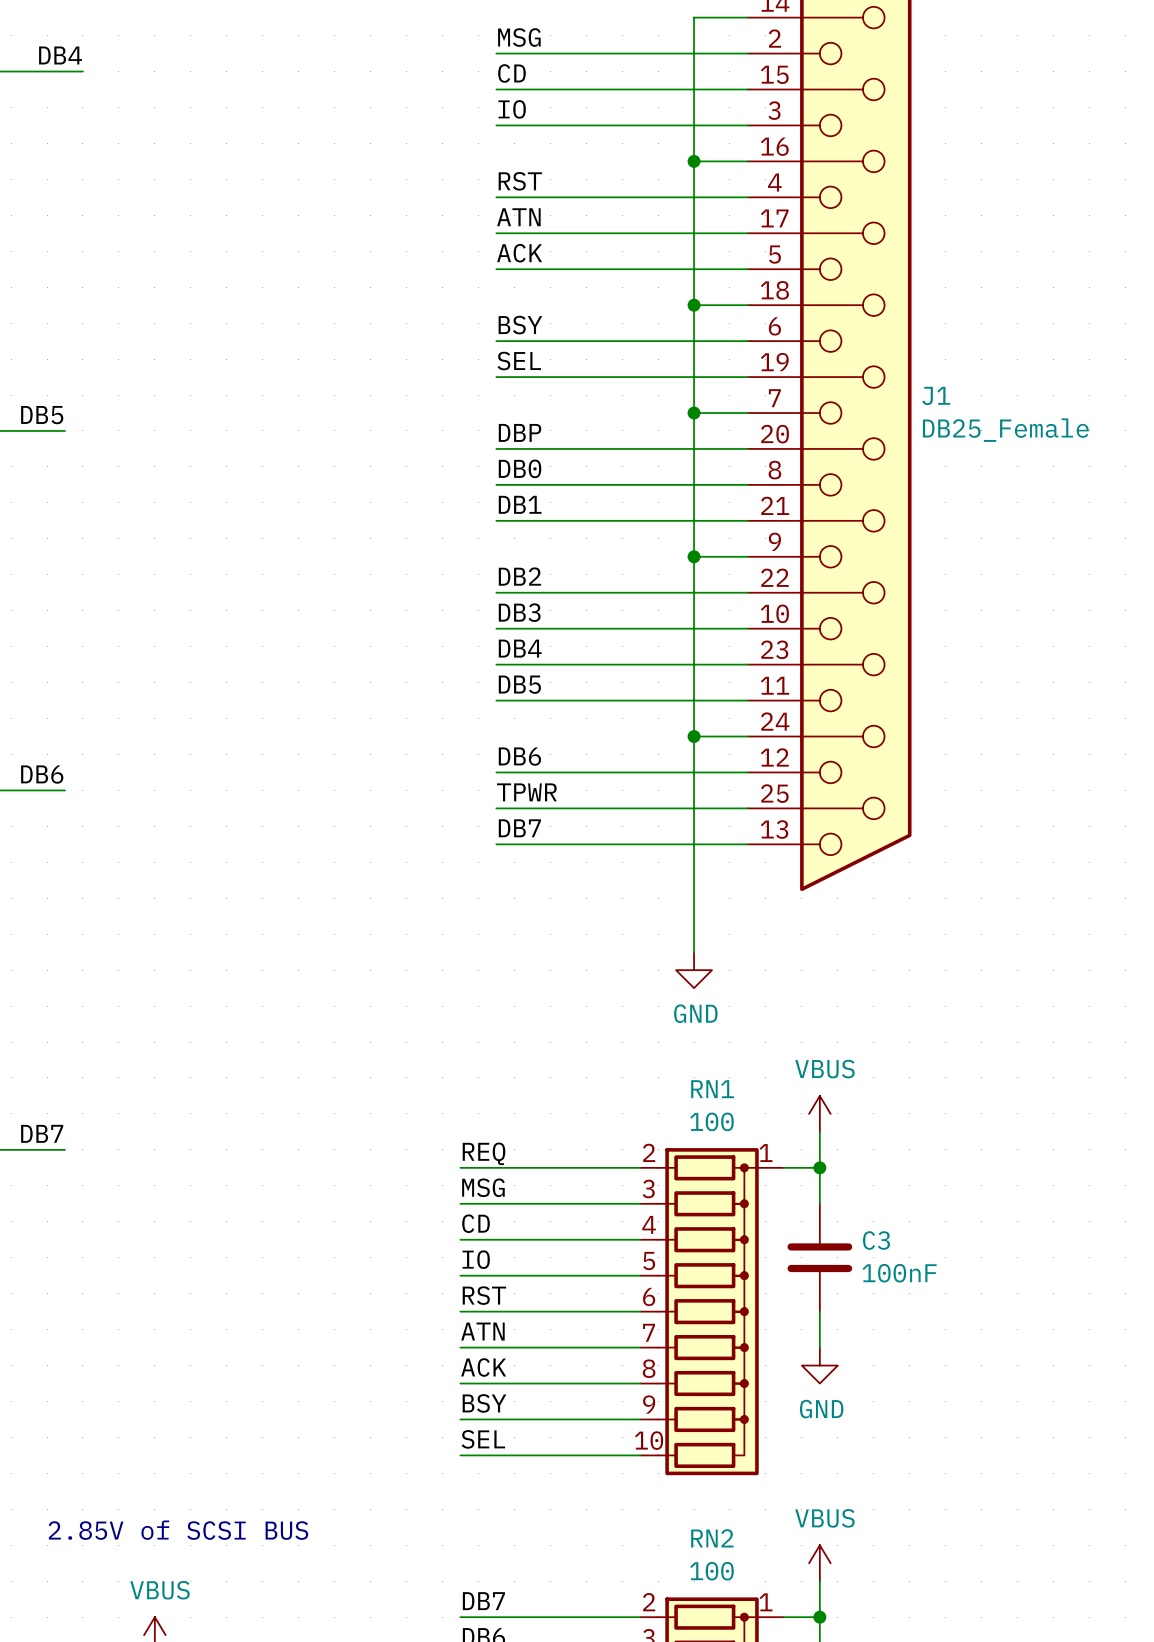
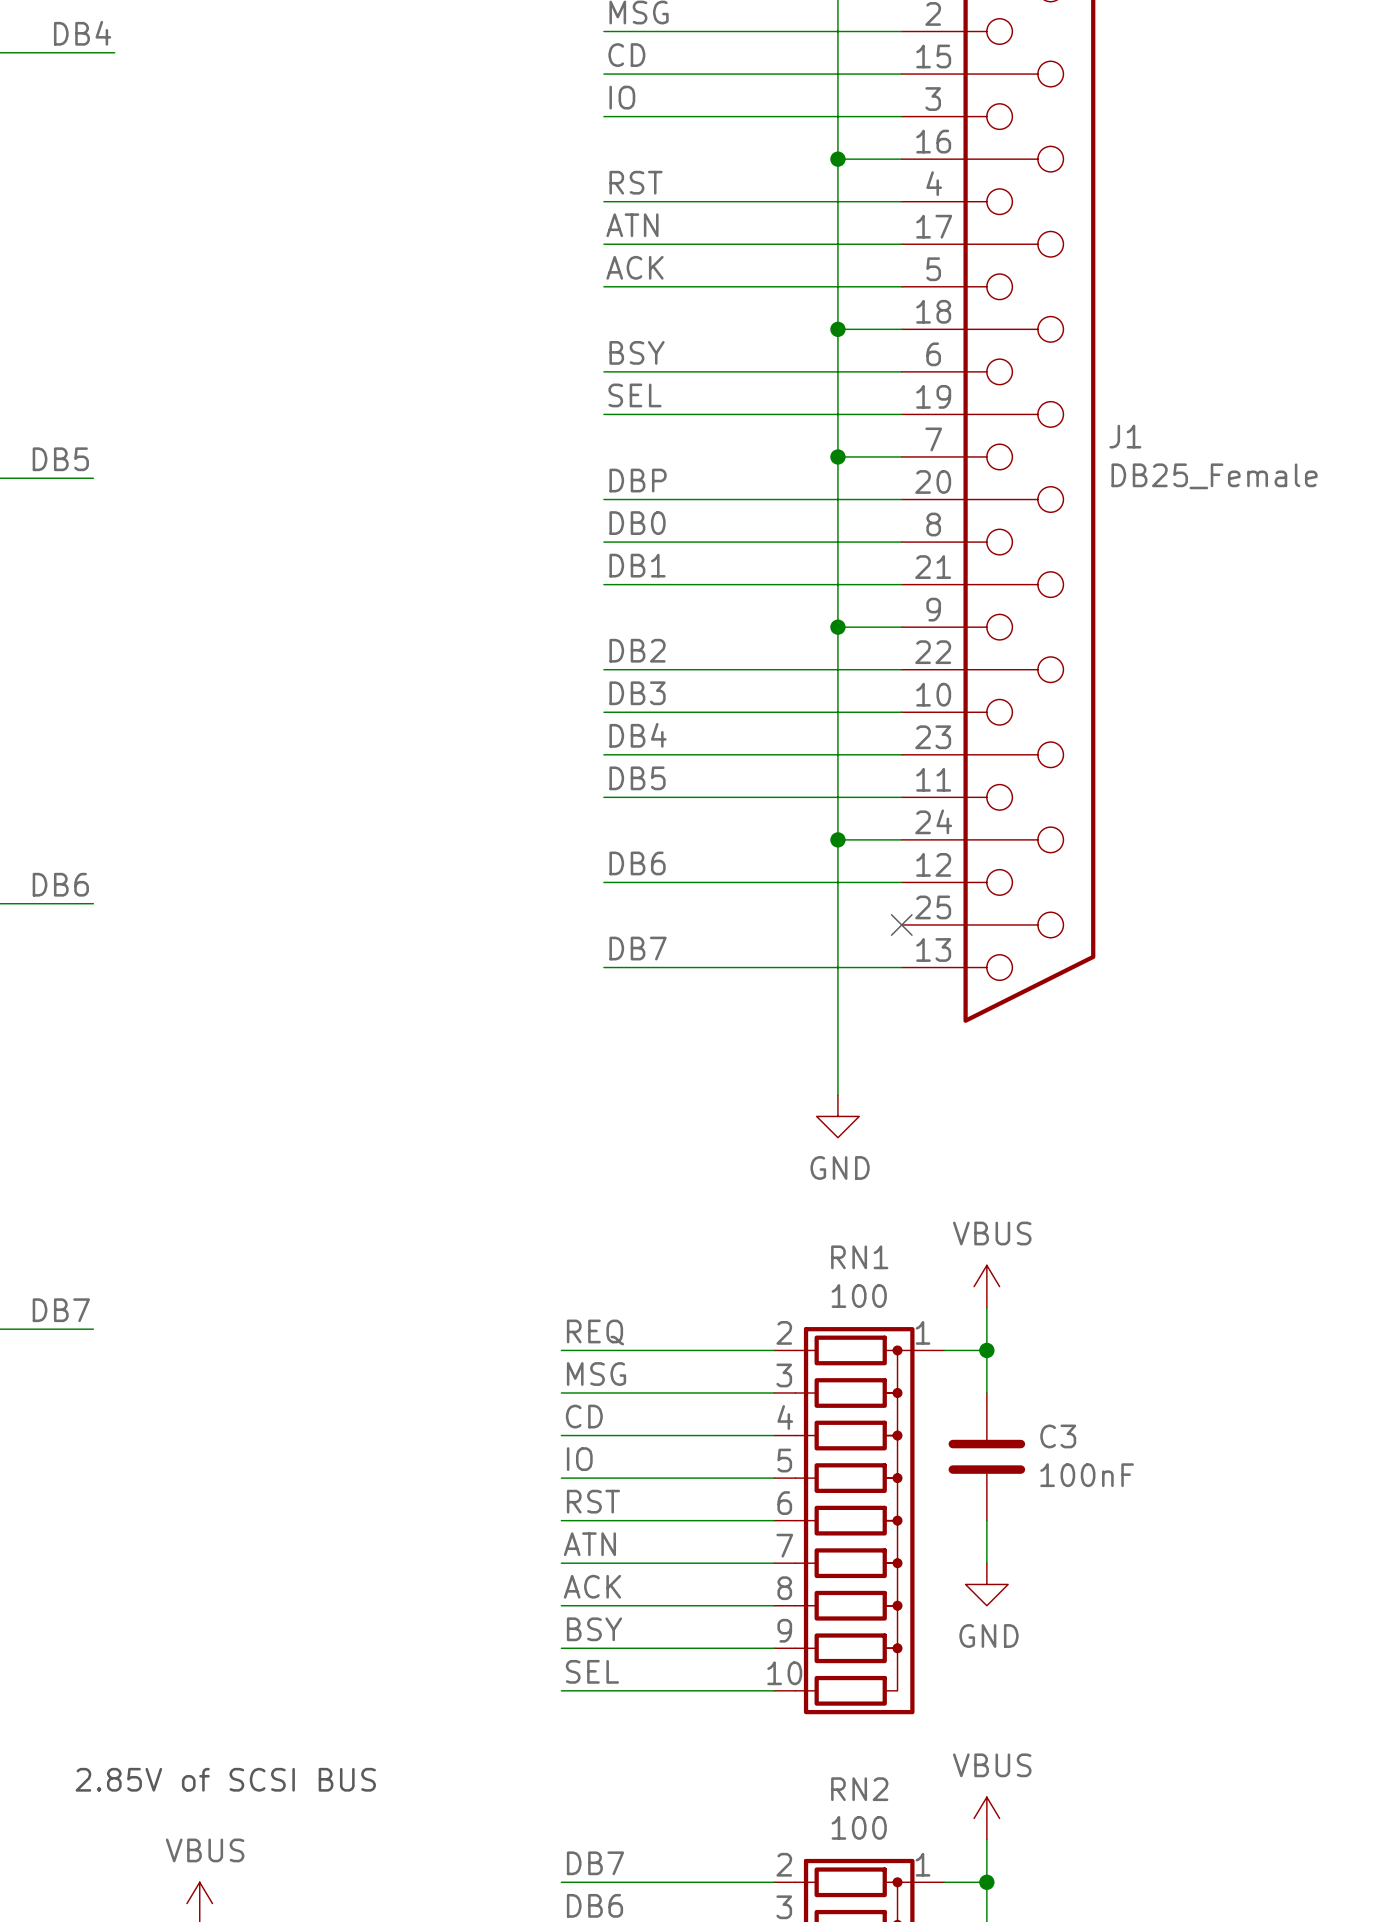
label: TPWR (526, 792) -> none
wire: (496, 808) (747, 808) -> none
no-connect mark: none -> (901, 924)

